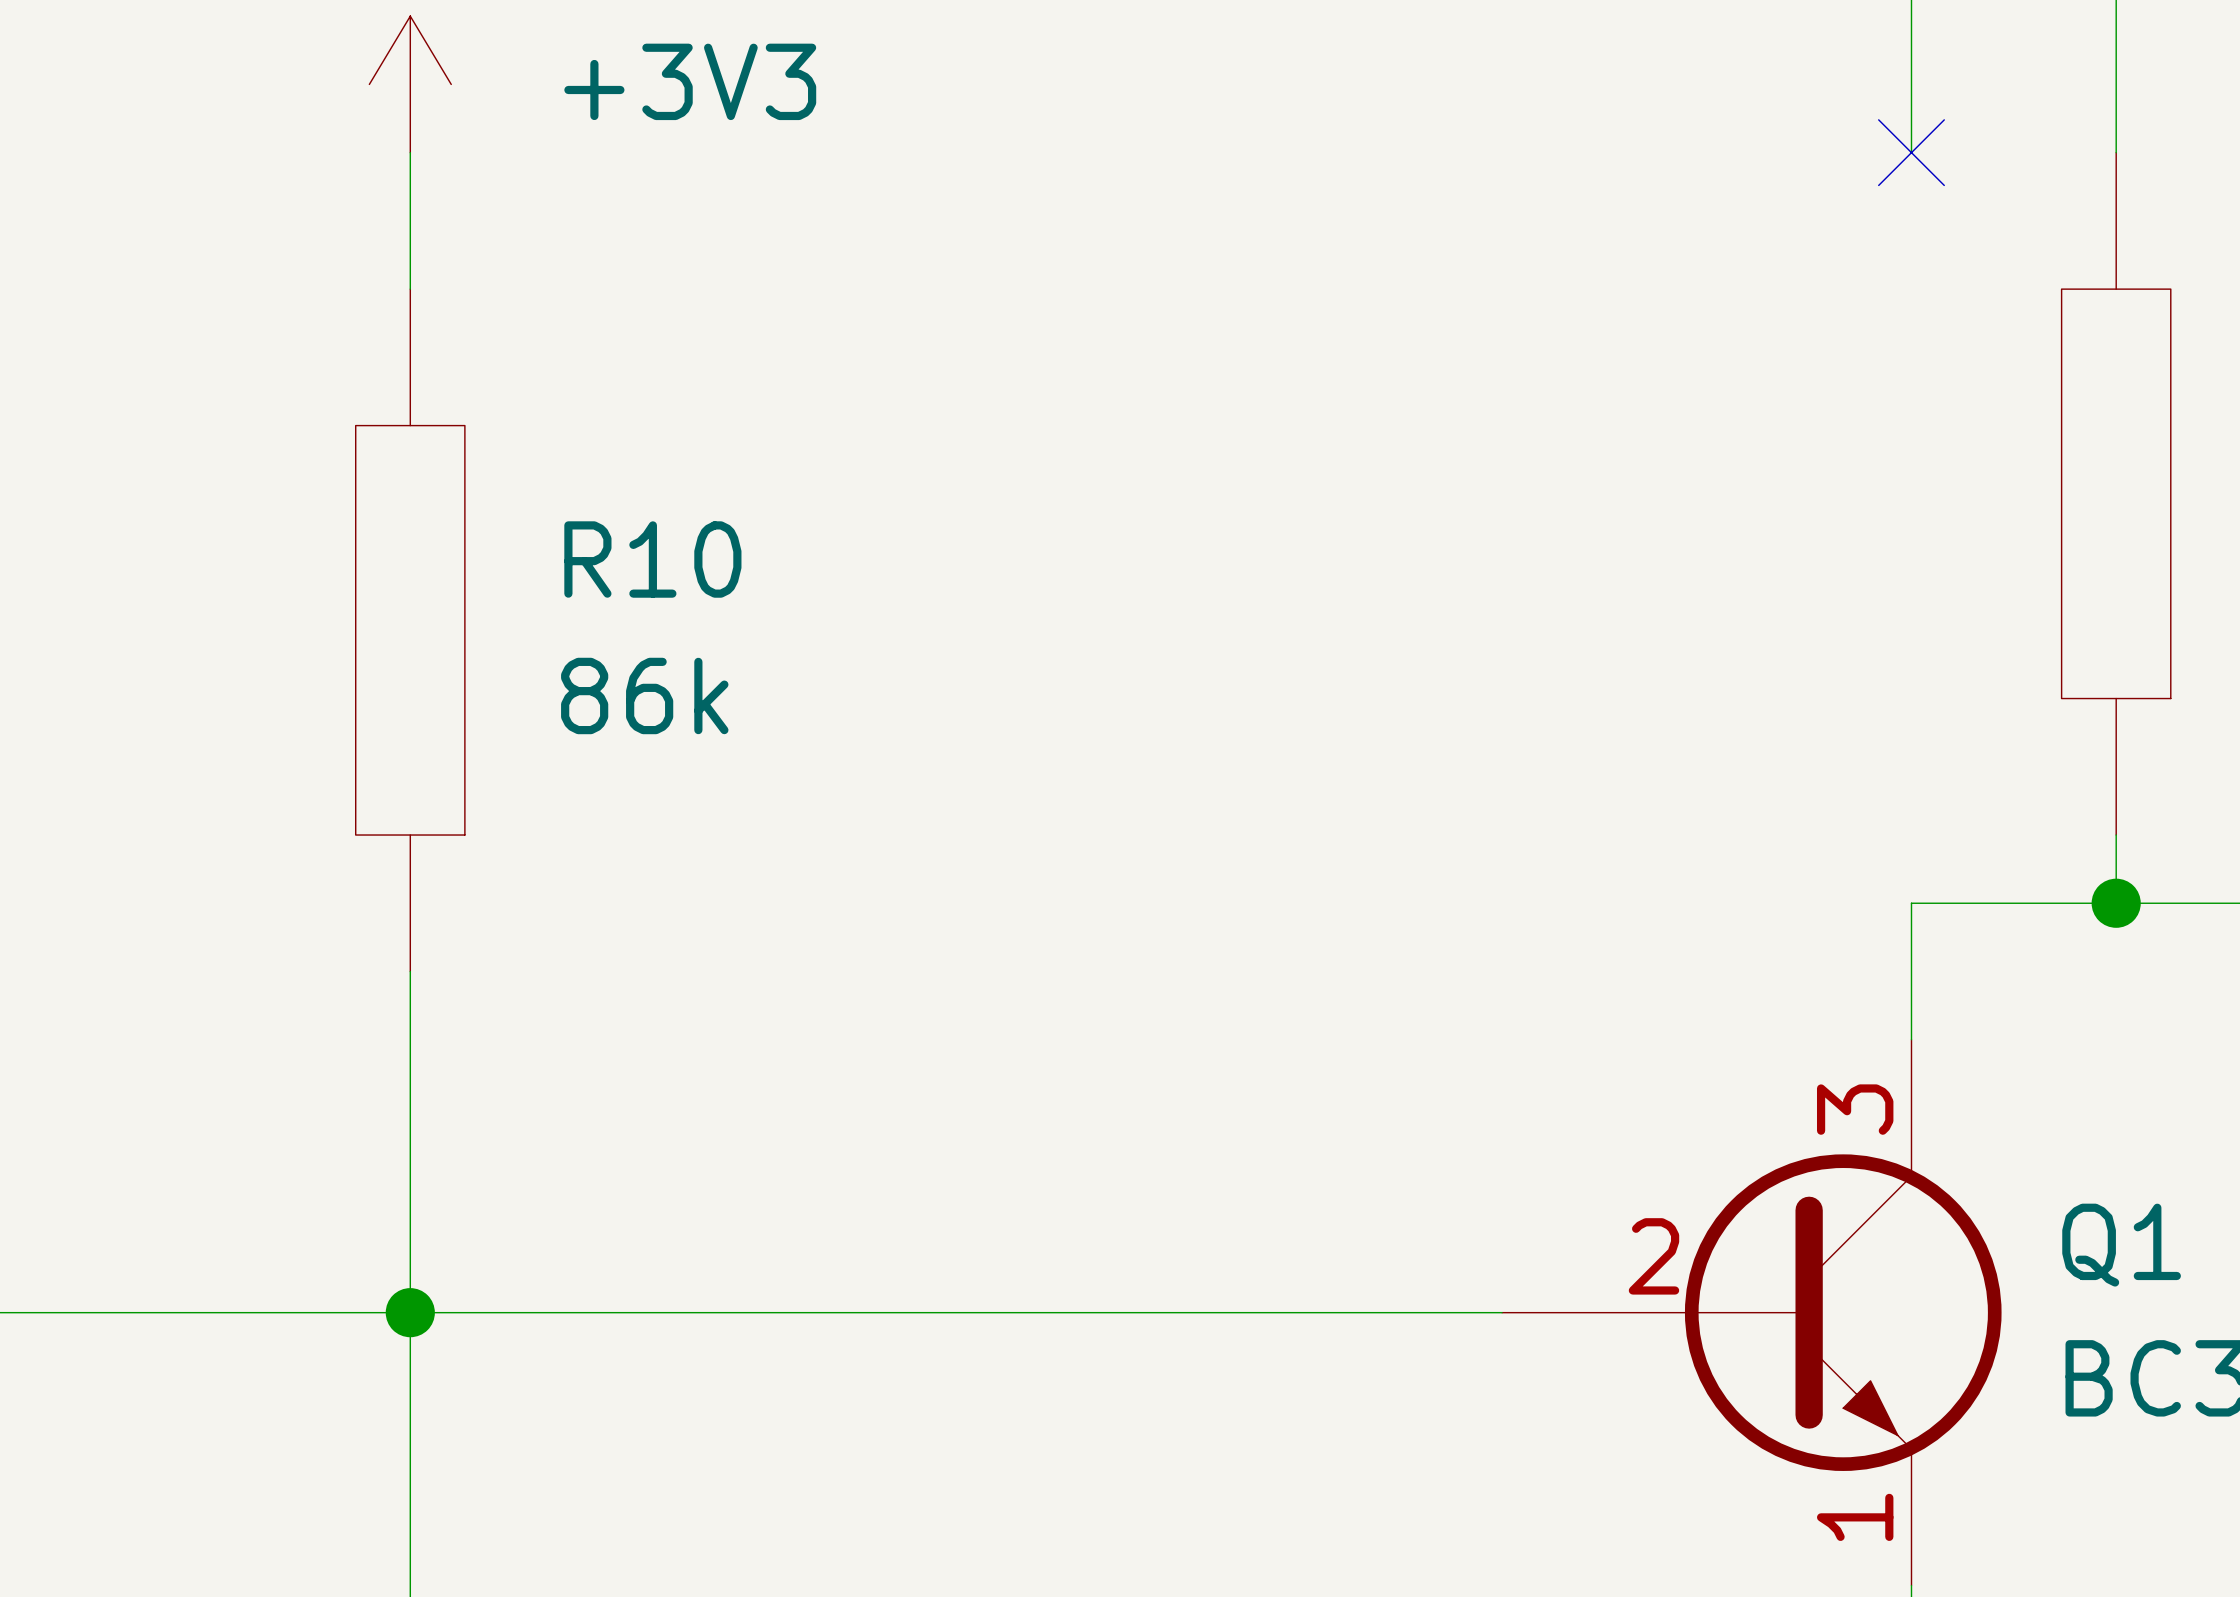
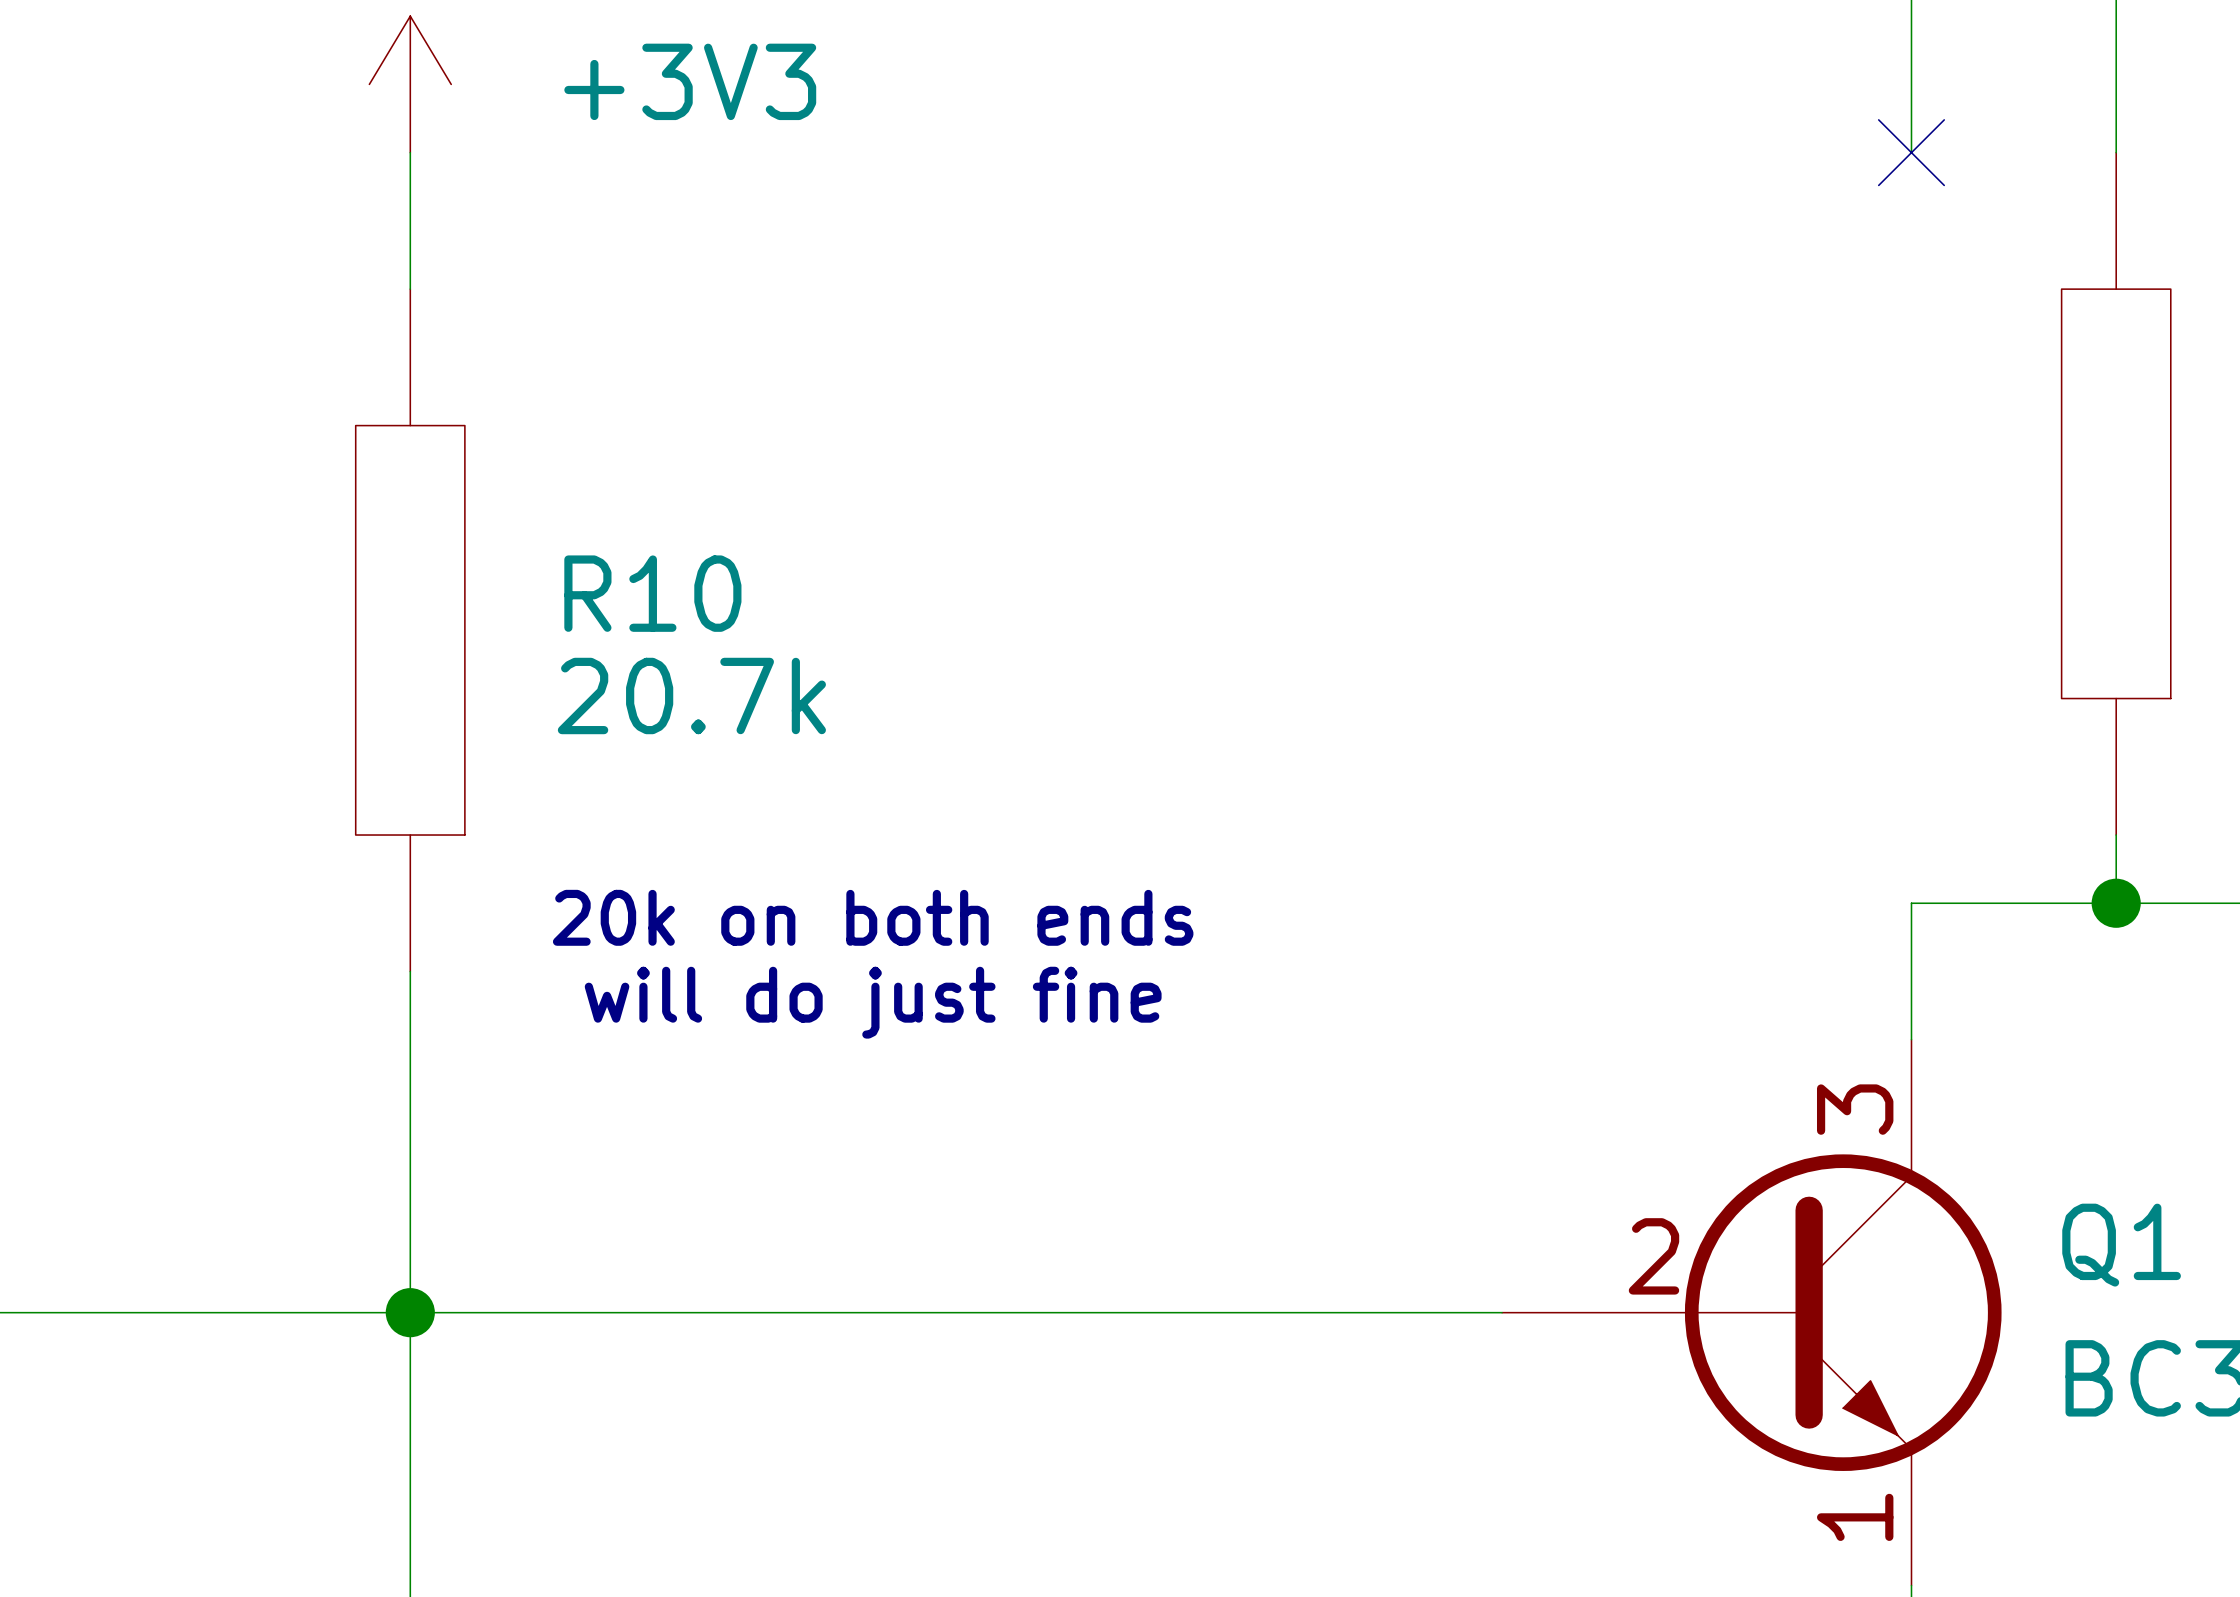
R10 name position: R10 (652, 559) -> R10 (652, 593)
R10 value: 86k (644, 695) -> 20.7k (691, 695)
text: none -> 20k on both ends (873, 917)
text: none -> will do just fine (873, 1002)

